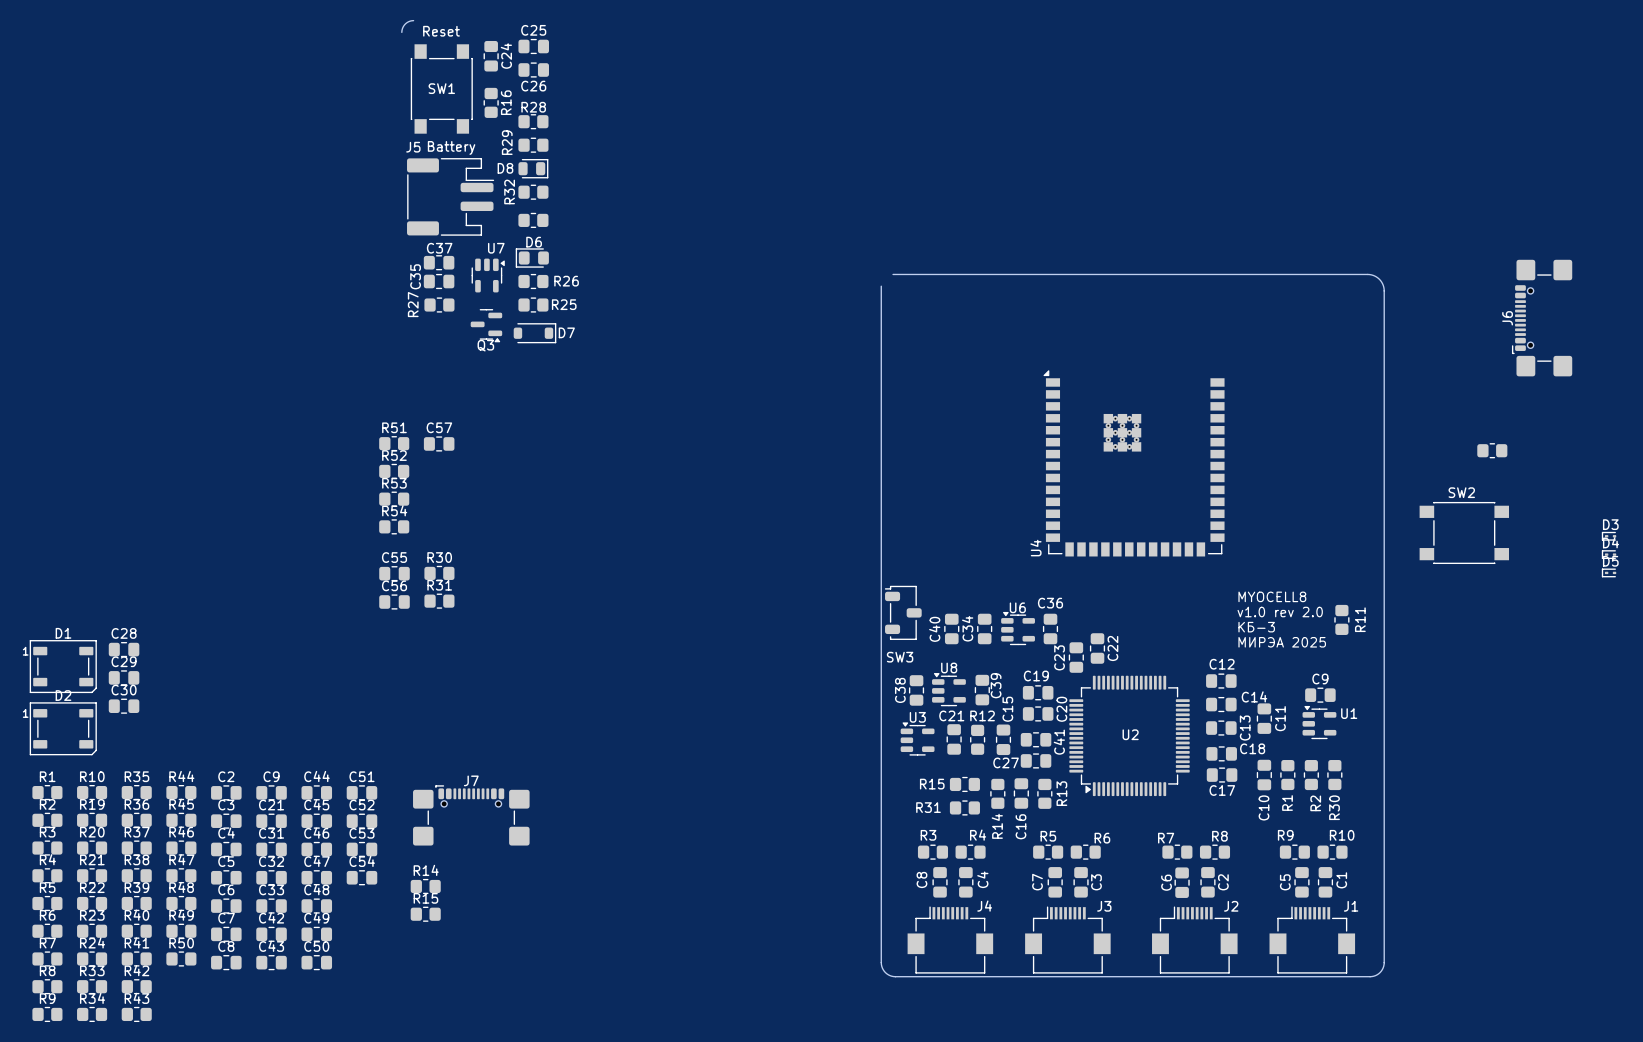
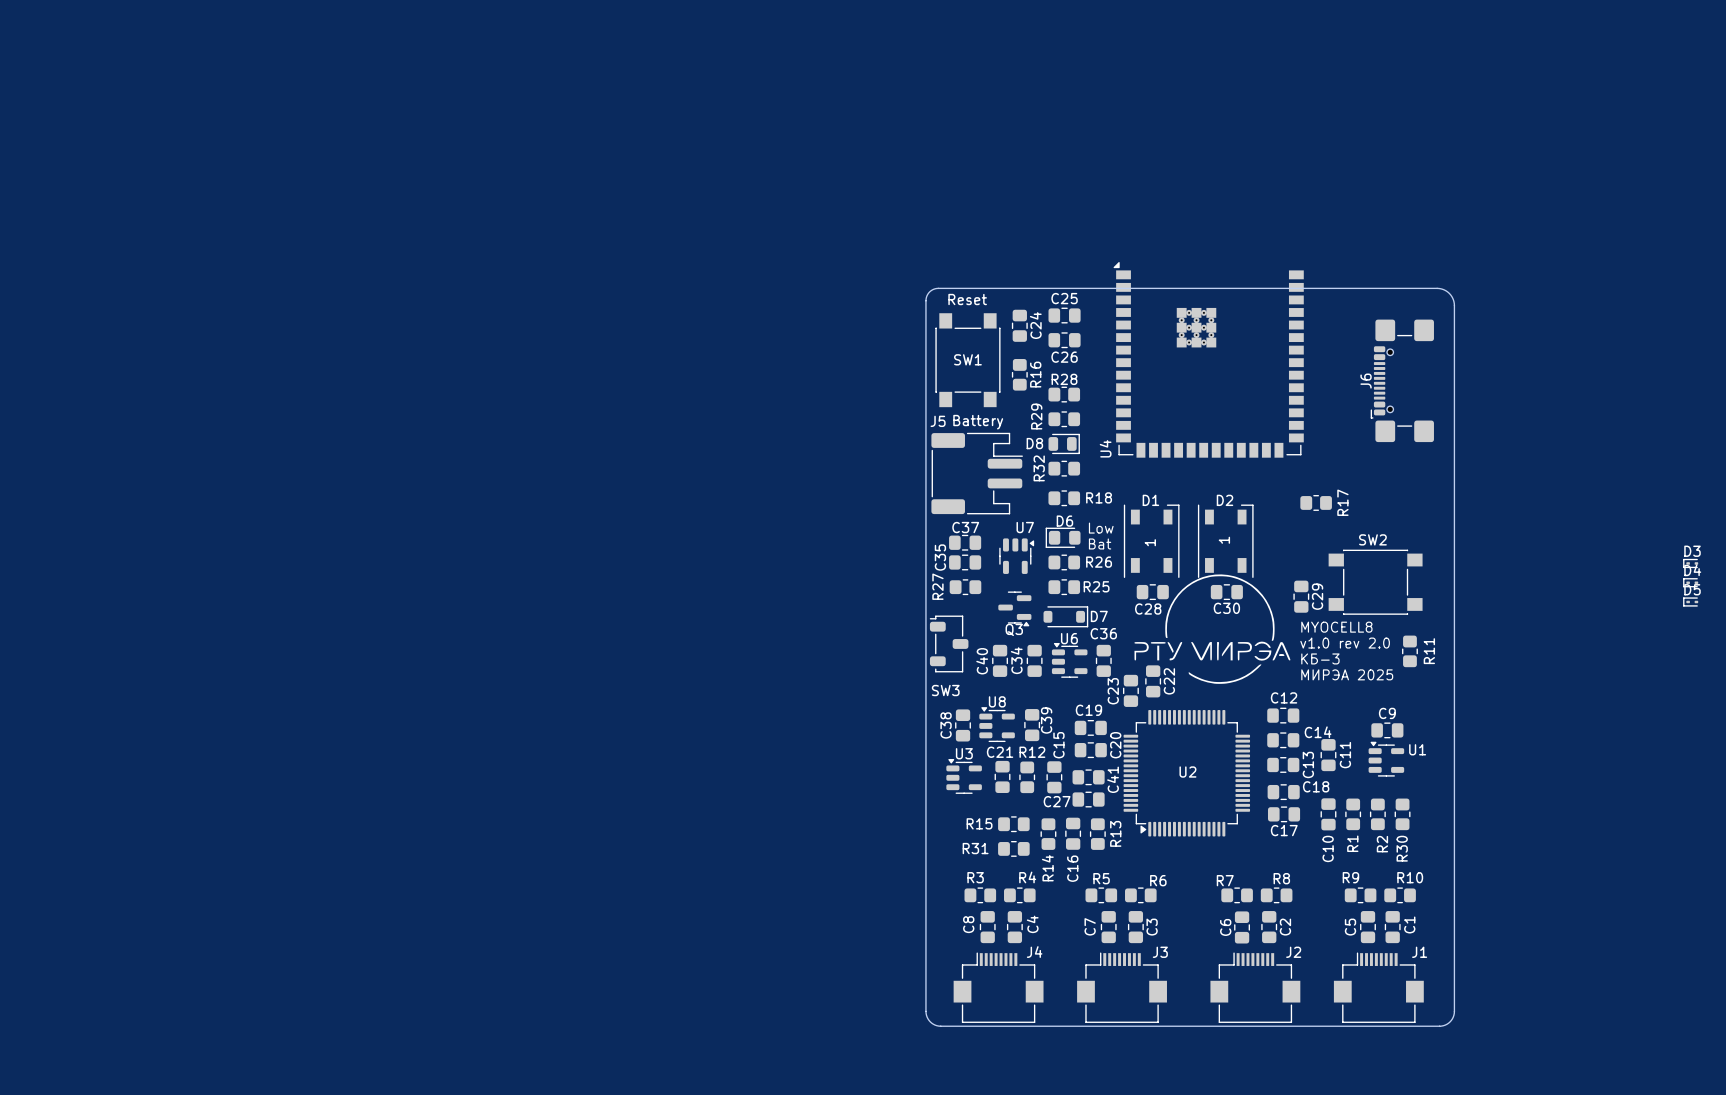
board edge: (413, 20) (405, 24) (401, 32) -> none
text: Reset (441, 31) -> none
C25 position: (533, 46) -> (1064, 315)
C24 position: (491, 56) -> (1019, 325)
C26 position: (533, 69) -> (1064, 340)
SW1 position: (441, 88) -> (967, 360)
R16 position: (491, 102) -> (1019, 374)
R28 position: (533, 121) -> (1064, 394)
R29 position: (533, 145) -> (1064, 419)
text: Battery (451, 147) -> none
D8 position: (533, 168) -> (1064, 443)
R32 position: (533, 192) -> (1064, 468)
J5 position: (450, 196) -> (977, 473)
part: (533, 220) -> none
D6 position: (532, 258) -> (1063, 537)
C37 position: (439, 262) -> (965, 542)
board edge: none -> (938, 288) (929, 291) (925, 300)
U7 position: (488, 275) -> (1016, 556)
C35 position: (439, 281) -> (965, 562)
R26 position: (533, 281) -> (1064, 562)
text: none -> Reset (967, 299)
R27 position: (439, 305) -> (965, 587)
R25 position: (533, 305) -> (1064, 587)
J6 position: (1542, 318) -> (1402, 380)
Q3 position: (486, 325) -> (1014, 608)
D7 position: (534, 333) -> (1065, 616)
text: none -> Battery (978, 422)
R51: (394, 443) -> none
C57: (439, 443) -> none
part: (1492, 450) -> none
U4 position: (1134, 463) -> (1208, 359)
R52: (394, 471) -> none
R18: none -> (1064, 498)
R17: none -> (1316, 502)
R53: (394, 499) -> none
text: none -> Low (1101, 528)
text: none -> Bat (1100, 543)
R54: (394, 526) -> none
SW2 position: (1464, 532) -> (1375, 582)
drawing: none -> [1134, 574, 1291, 684]
C55: (394, 573) -> none
R30: (439, 573) -> none
C56: (394, 601) -> none
R31: (439, 601) -> none
C28 name position: C28 (124, 633) -> C28 (1148, 609)
D1 footprint: [29, 640, 97, 693] -> [1123, 504, 1180, 578]
C28 position: (124, 649) -> (1152, 592)
C29 rotation: 0° (124, 677) -> 90° clockwise (1301, 596)
C29 position: (124, 677) -> (1301, 596)
C30 name position: C30 (124, 690) -> C30 (1226, 608)
D2 footprint: [29, 702, 97, 756] -> [1198, 504, 1254, 578]
C30 position: (124, 706) -> (1226, 592)
R1: (47, 792) -> none
R10: (92, 792) -> none
R35: (136, 792) -> none
R44: (181, 792) -> none
C2: (226, 792) -> none
C9: (271, 792) -> none
C44: (316, 792) -> none
C51: (361, 792) -> none
J7: (471, 815) -> none
R2: (47, 820) -> none
R19: (92, 820) -> none
R36: (136, 820) -> none
R45: (181, 820) -> none
C3: (226, 821) -> none
C21: (271, 821) -> none
C45: (316, 821) -> none
C52: (361, 821) -> none
R3: (47, 848) -> none
R20: (92, 848) -> none
R37: (136, 848) -> none
R46: (181, 848) -> none
C4: (226, 849) -> none
C31: (271, 849) -> none
C46: (316, 849) -> none
C53: (361, 849) -> none
R4: (47, 875) -> none
R21: (92, 875) -> none
R38: (136, 875) -> none
R47: (181, 875) -> none
C5: (226, 877) -> none
C32: (271, 877) -> none
C47: (316, 877) -> none
C54: (361, 877) -> none
R14: (425, 886) -> none
R5: (47, 903) -> none
R22: (92, 903) -> none
R39: (136, 903) -> none
R48: (181, 903) -> none
C6: (226, 906) -> none
C33: (271, 906) -> none
C48: (316, 906) -> none
R15: (425, 914) -> none
R6: (47, 931) -> none
R23: (92, 931) -> none
R40: (136, 931) -> none
R49: (181, 931) -> none
C7: (226, 934) -> none
C42: (271, 934) -> none
C49: (316, 934) -> none
R7: (47, 958) -> none
R24: (92, 958) -> none
R41: (136, 958) -> none
R50: (181, 958) -> none
C8: (226, 962) -> none
C43: (271, 962) -> none
C50: (316, 962) -> none
R8: (47, 986) -> none
R33: (92, 986) -> none
R42: (136, 986) -> none
R9: (47, 1014) -> none
R34: (92, 1014) -> none
R43: (136, 1014) -> none

